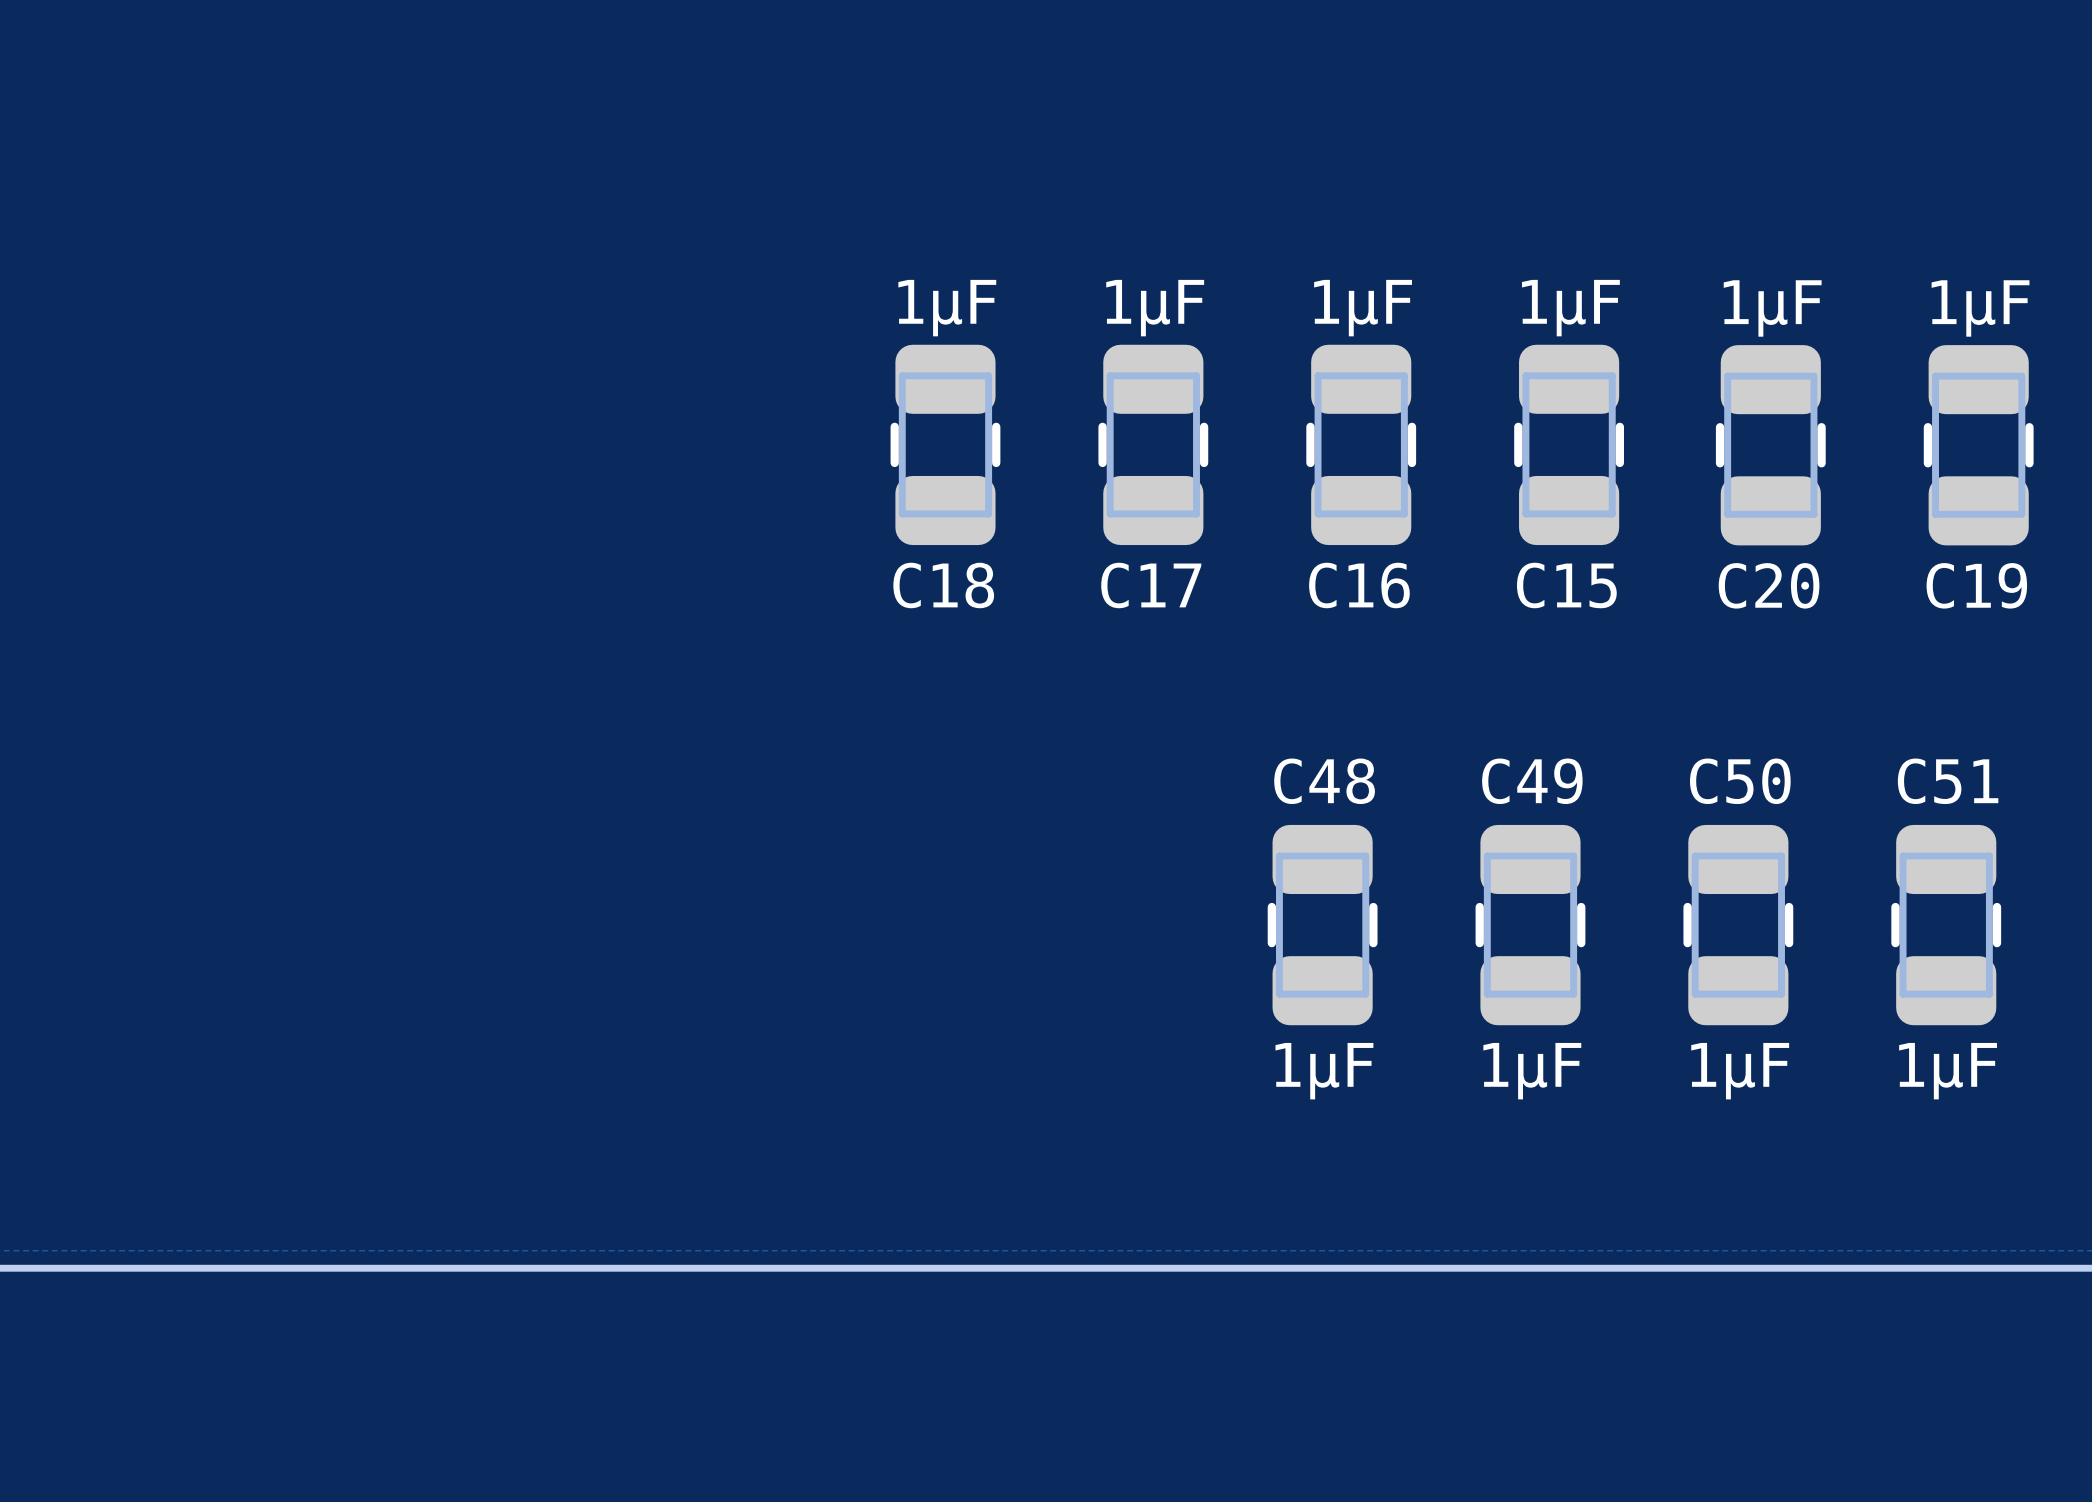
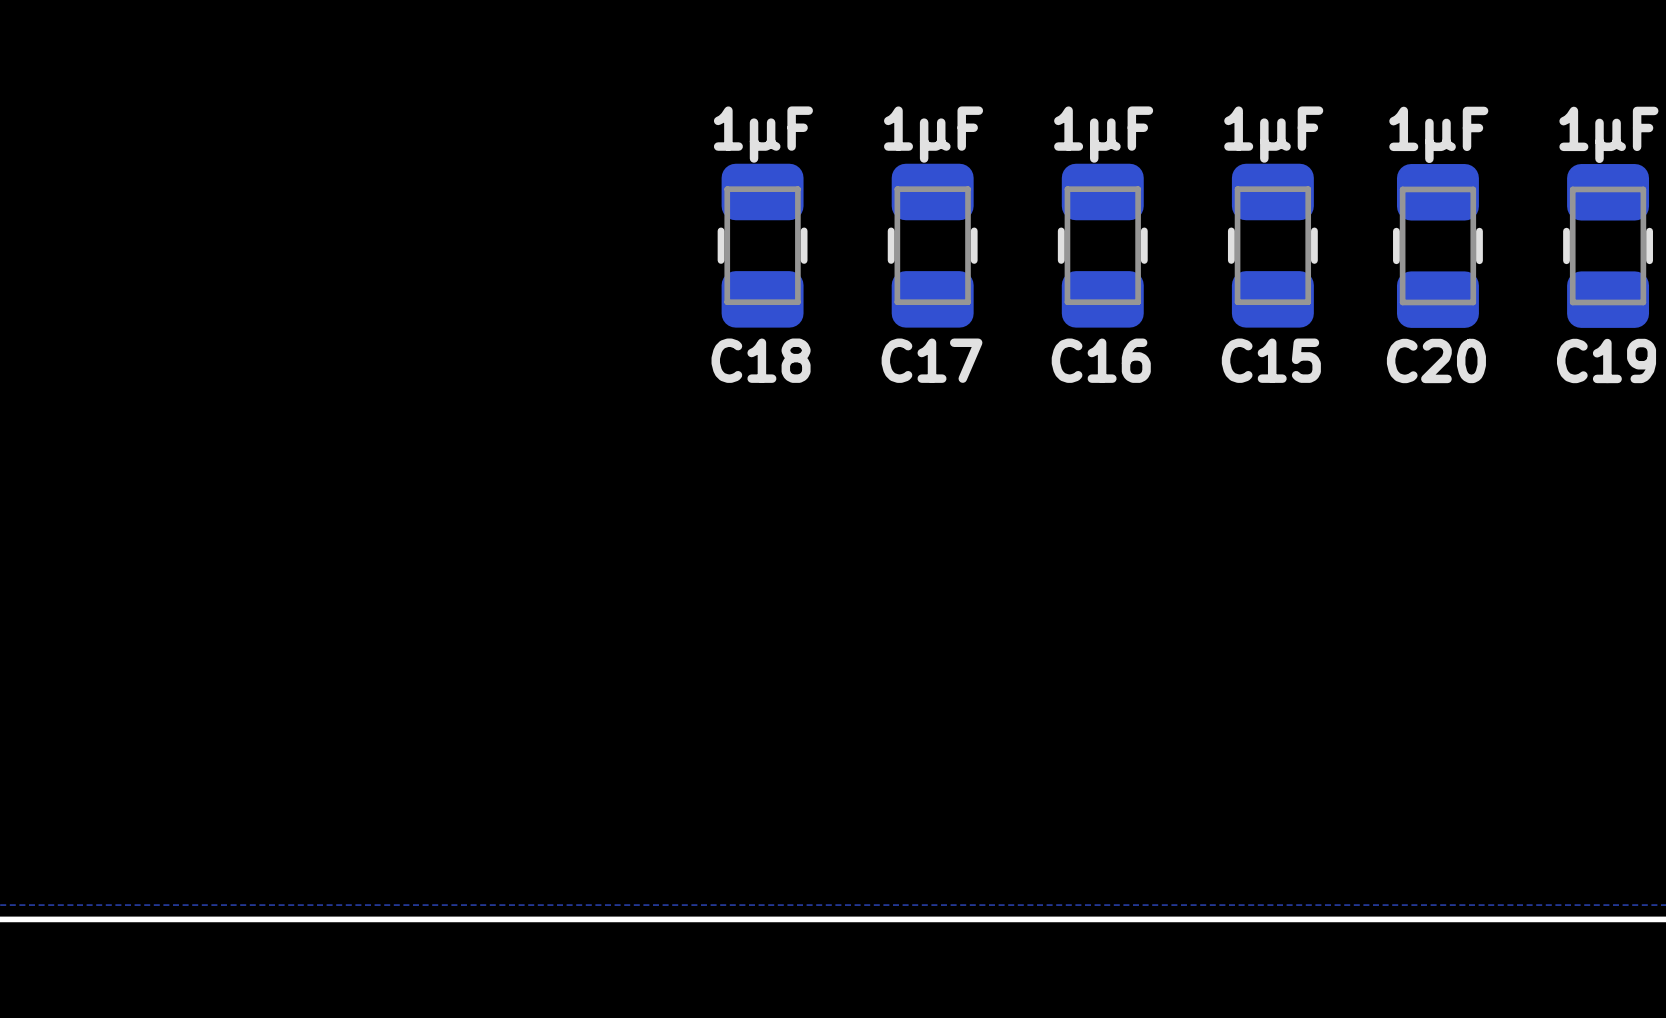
C48: 1μF (1322, 925) -> none
C49: 1μF (1530, 925) -> none
C50: 1μF (1738, 925) -> none
C51: 1μF (1946, 925) -> none

